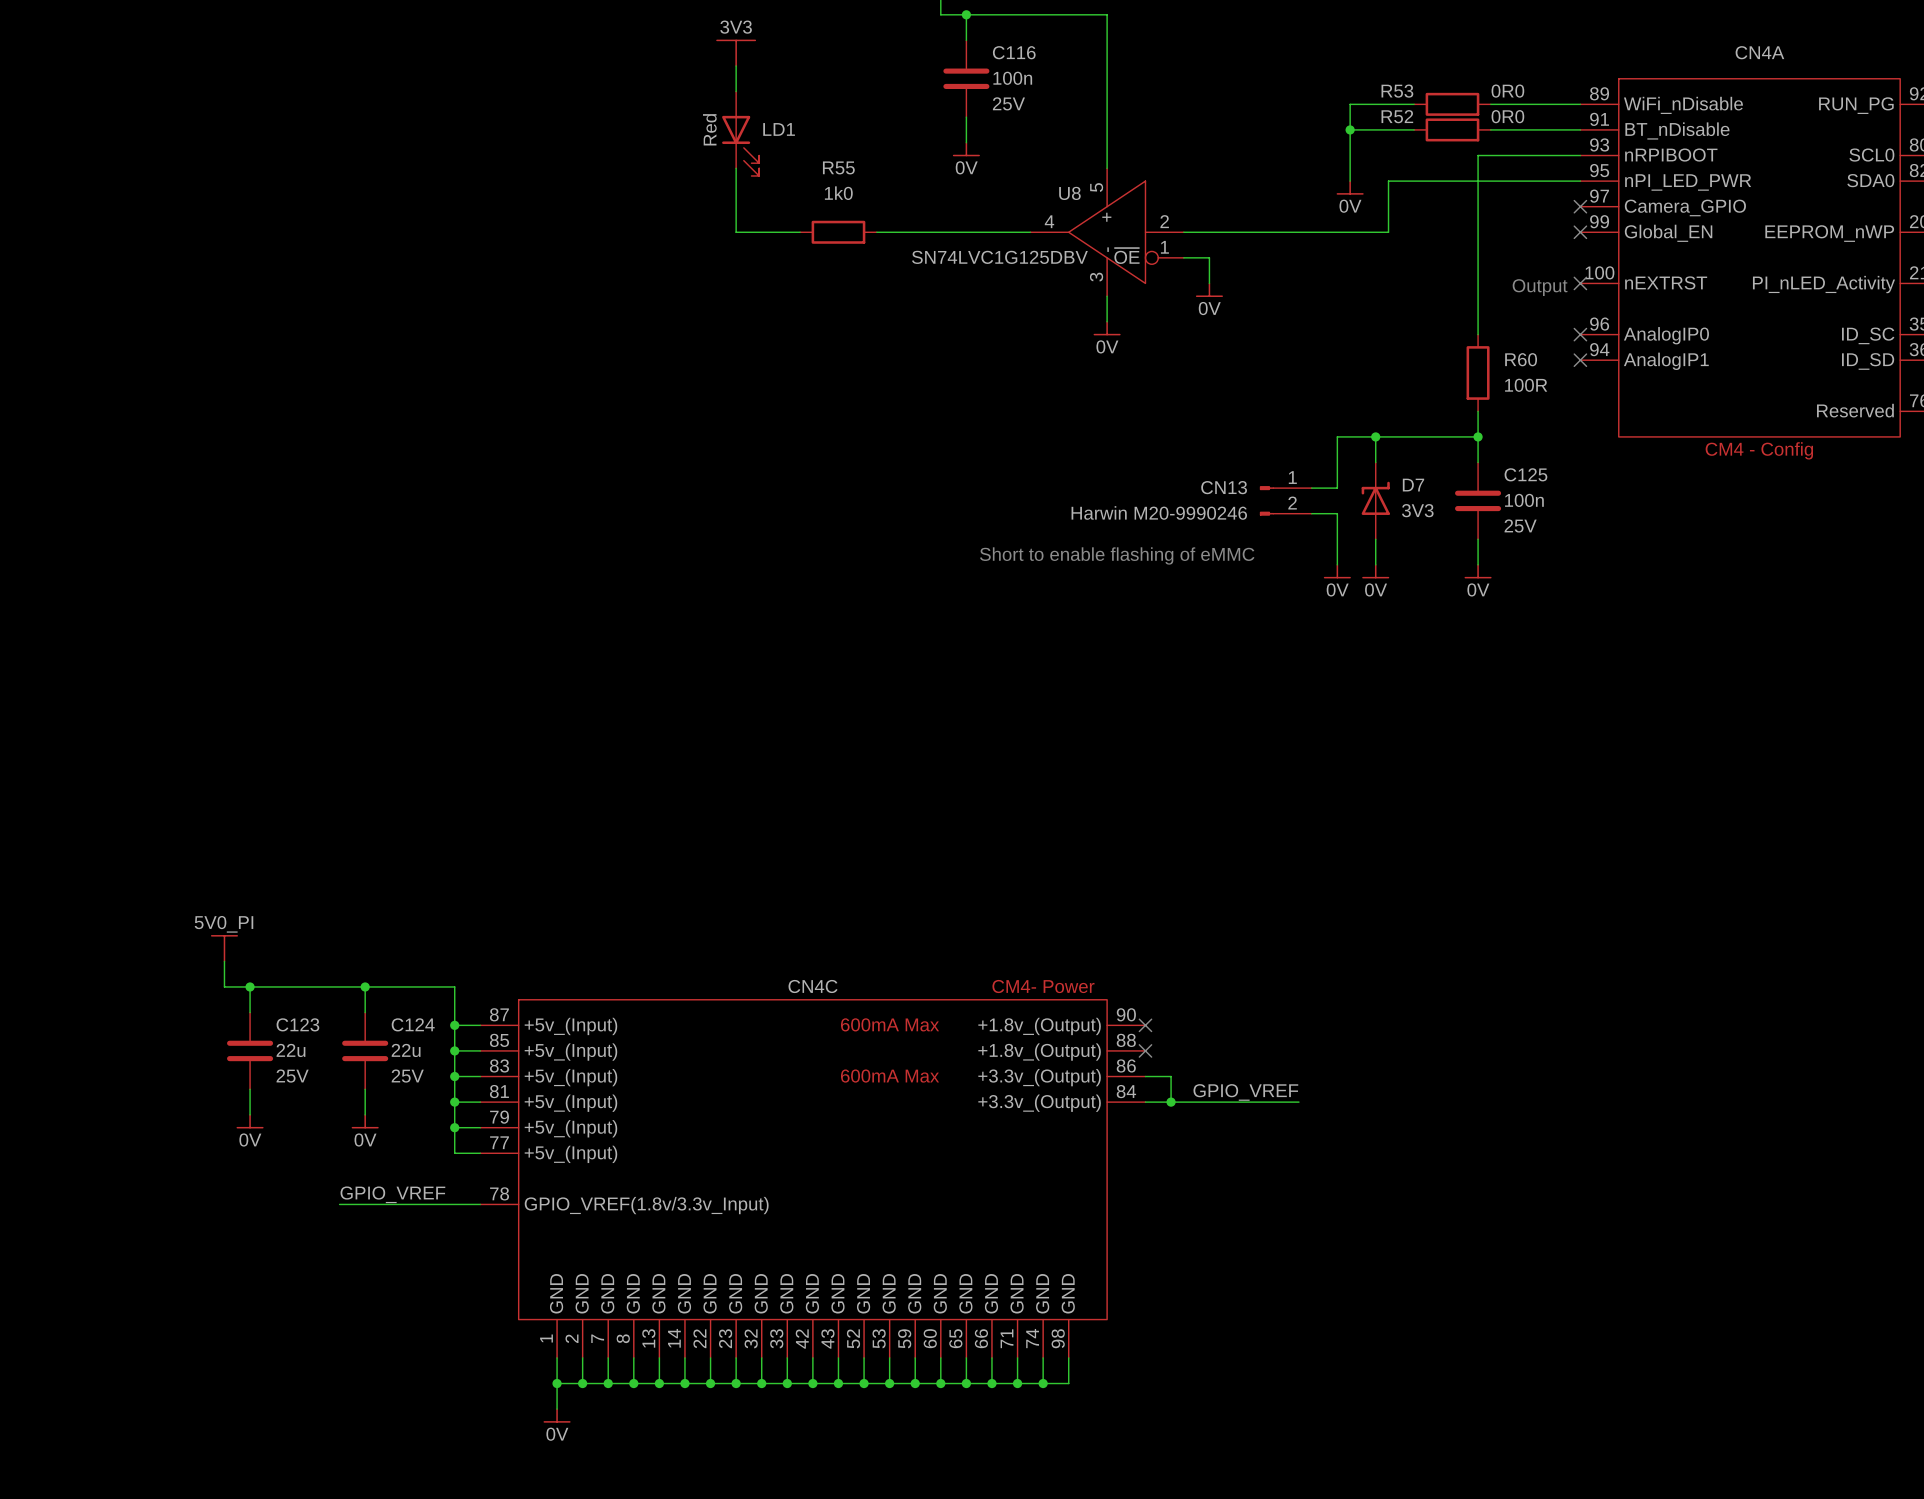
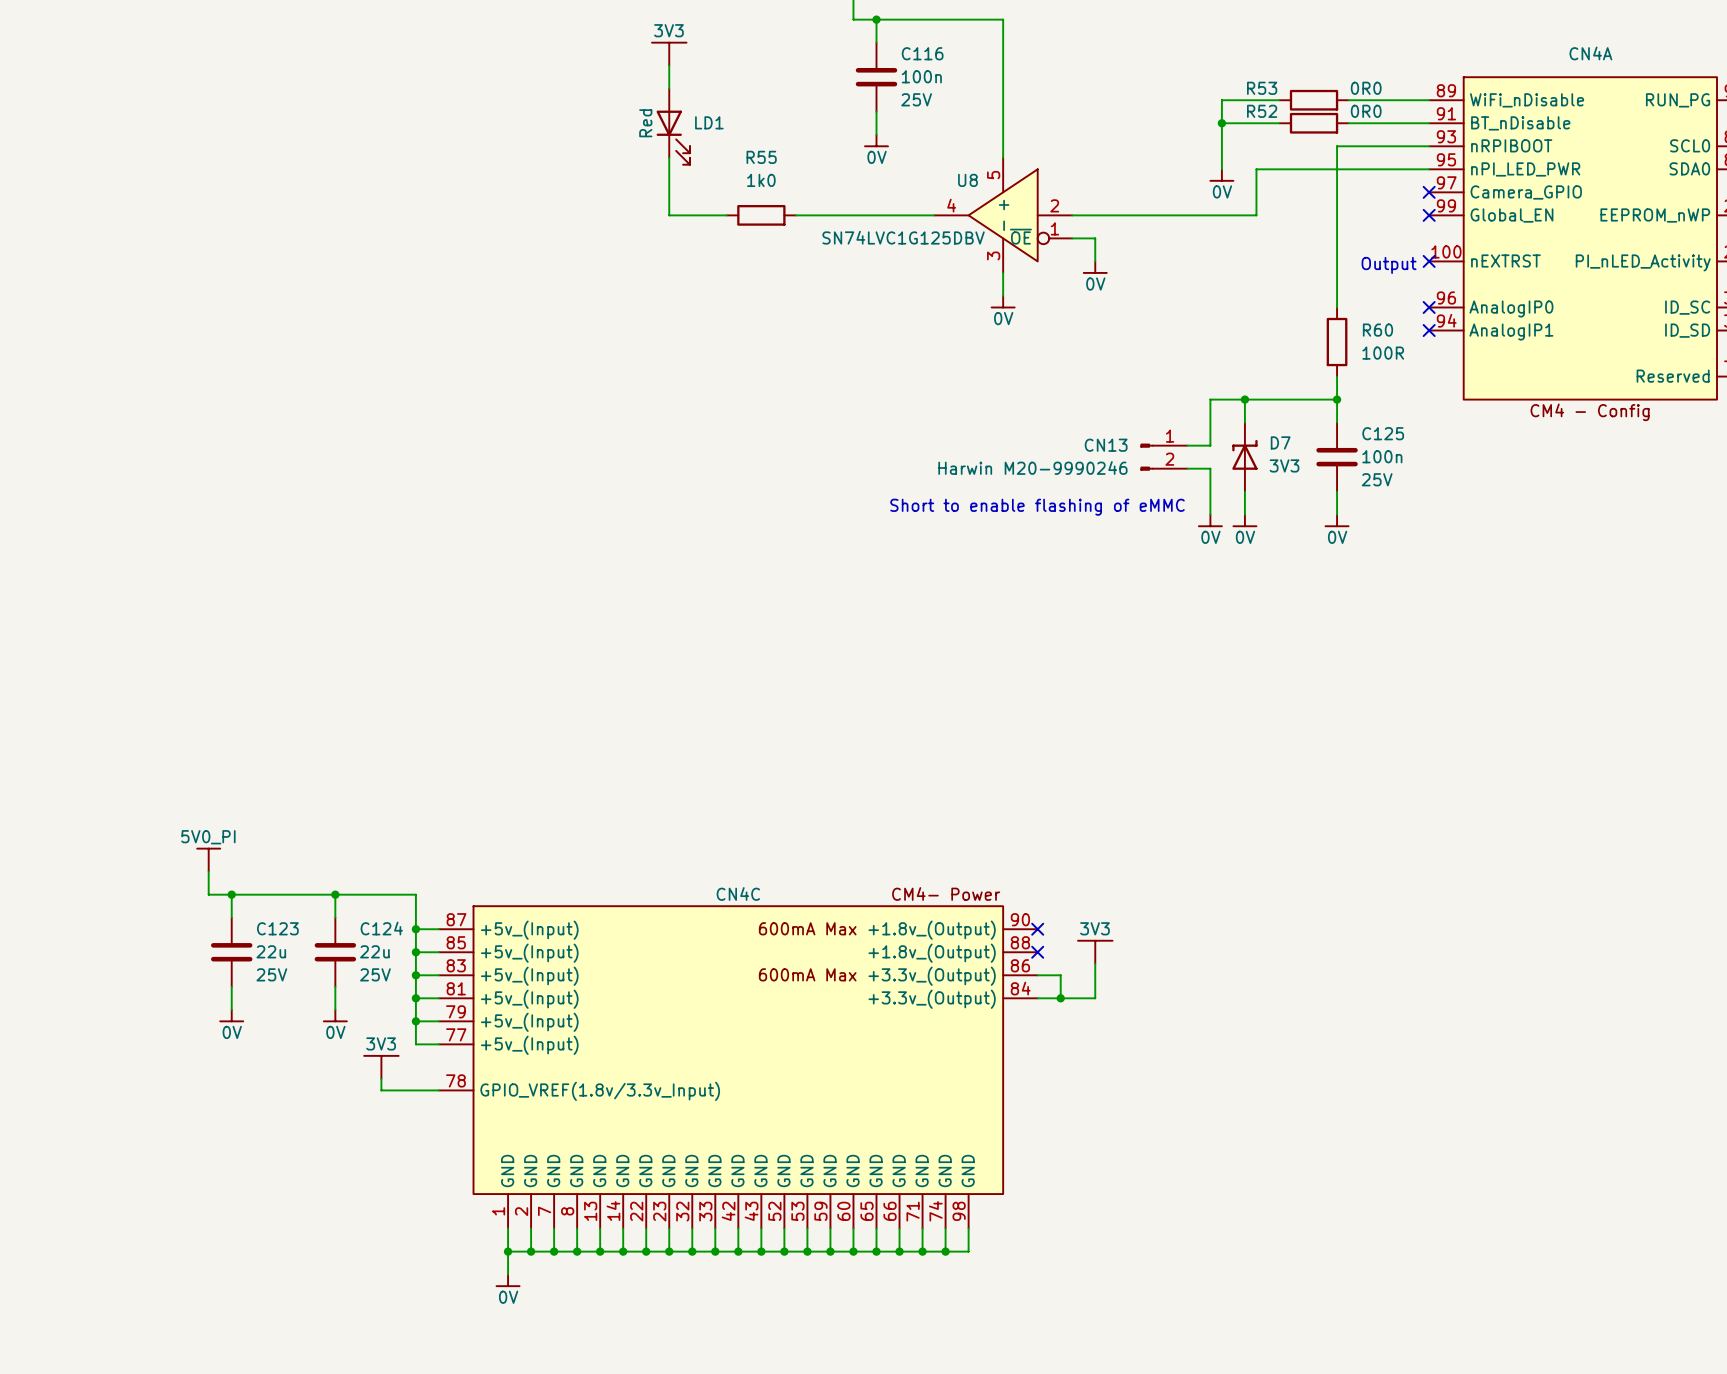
power symbol: none -> 3V3 (1095, 952)
label: GPIO_VREF (1245, 1092) -> none
wire: (1209, 1102) (1298, 1102) -> (1095, 998) (1095, 963)
power symbol: none -> 3V3 (381, 1067)
label: GPIO_VREF (392, 1194) -> none
wire: (339, 1204) (416, 1204) -> (381, 1078) (381, 1090)

